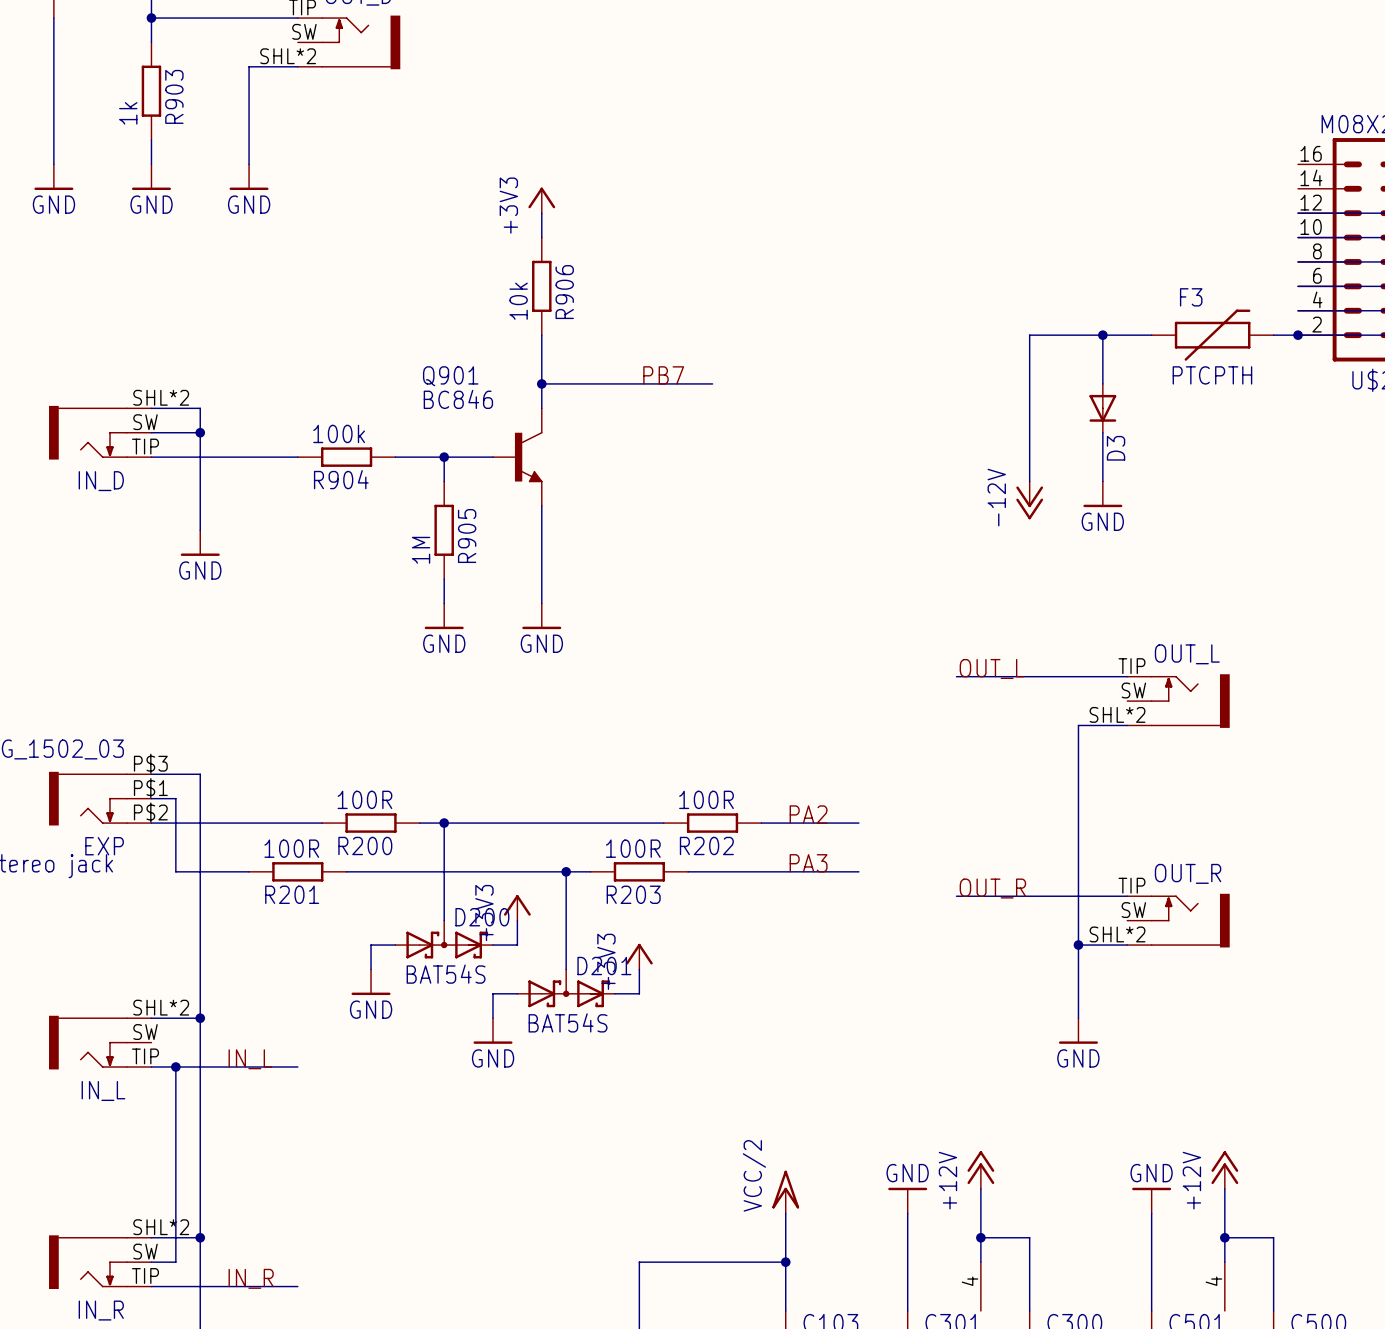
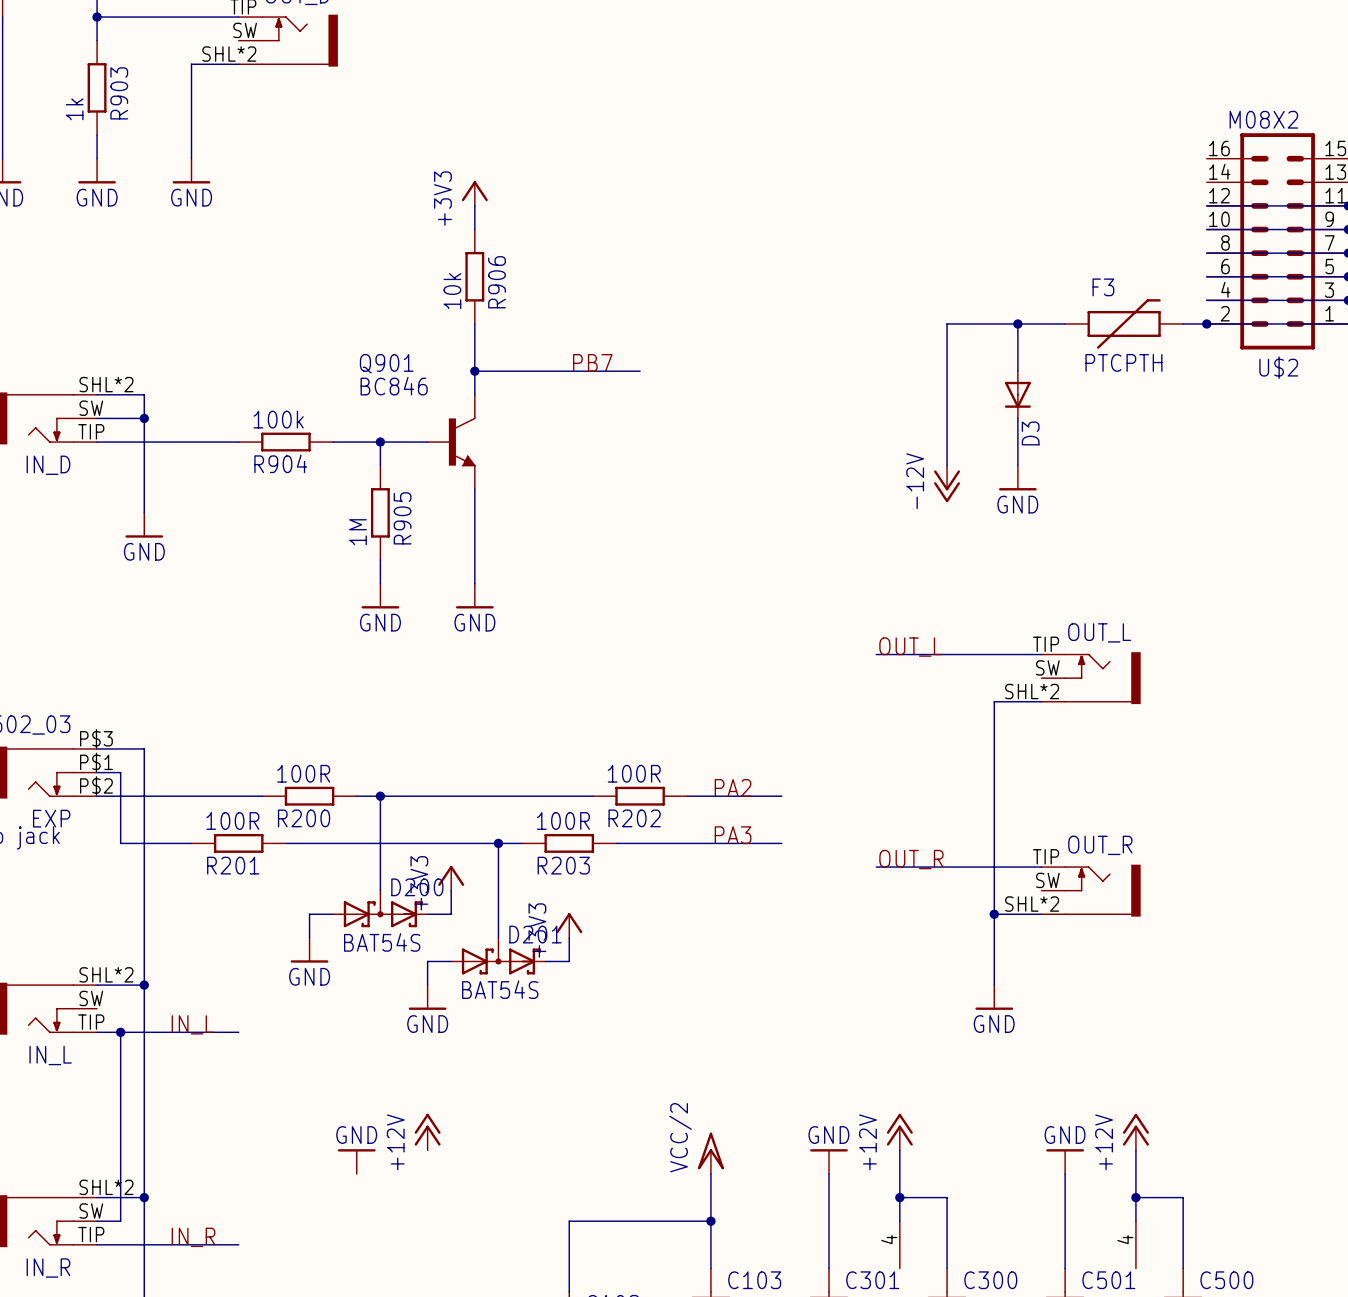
power symbol: none -> +12V (427, 1132)
power symbol: none -> GND (356, 1161)

